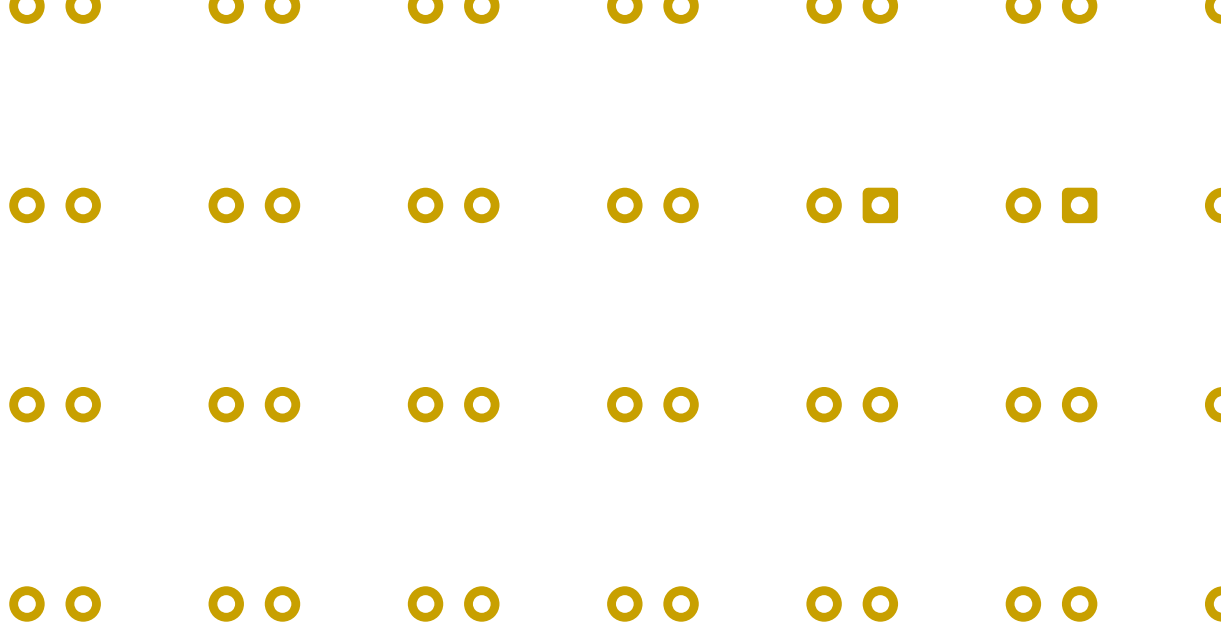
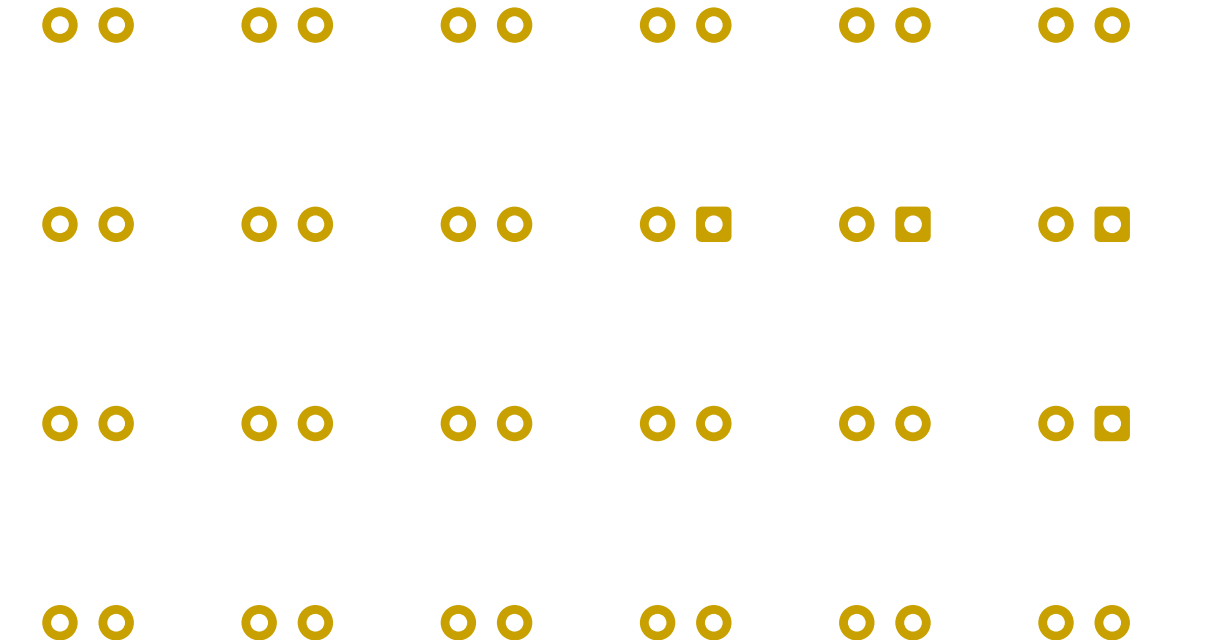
part footprint: [607, 187, 699, 224] -> [639, 206, 732, 243]
part footprint: [1005, 386, 1098, 423] -> [1038, 405, 1130, 442]

